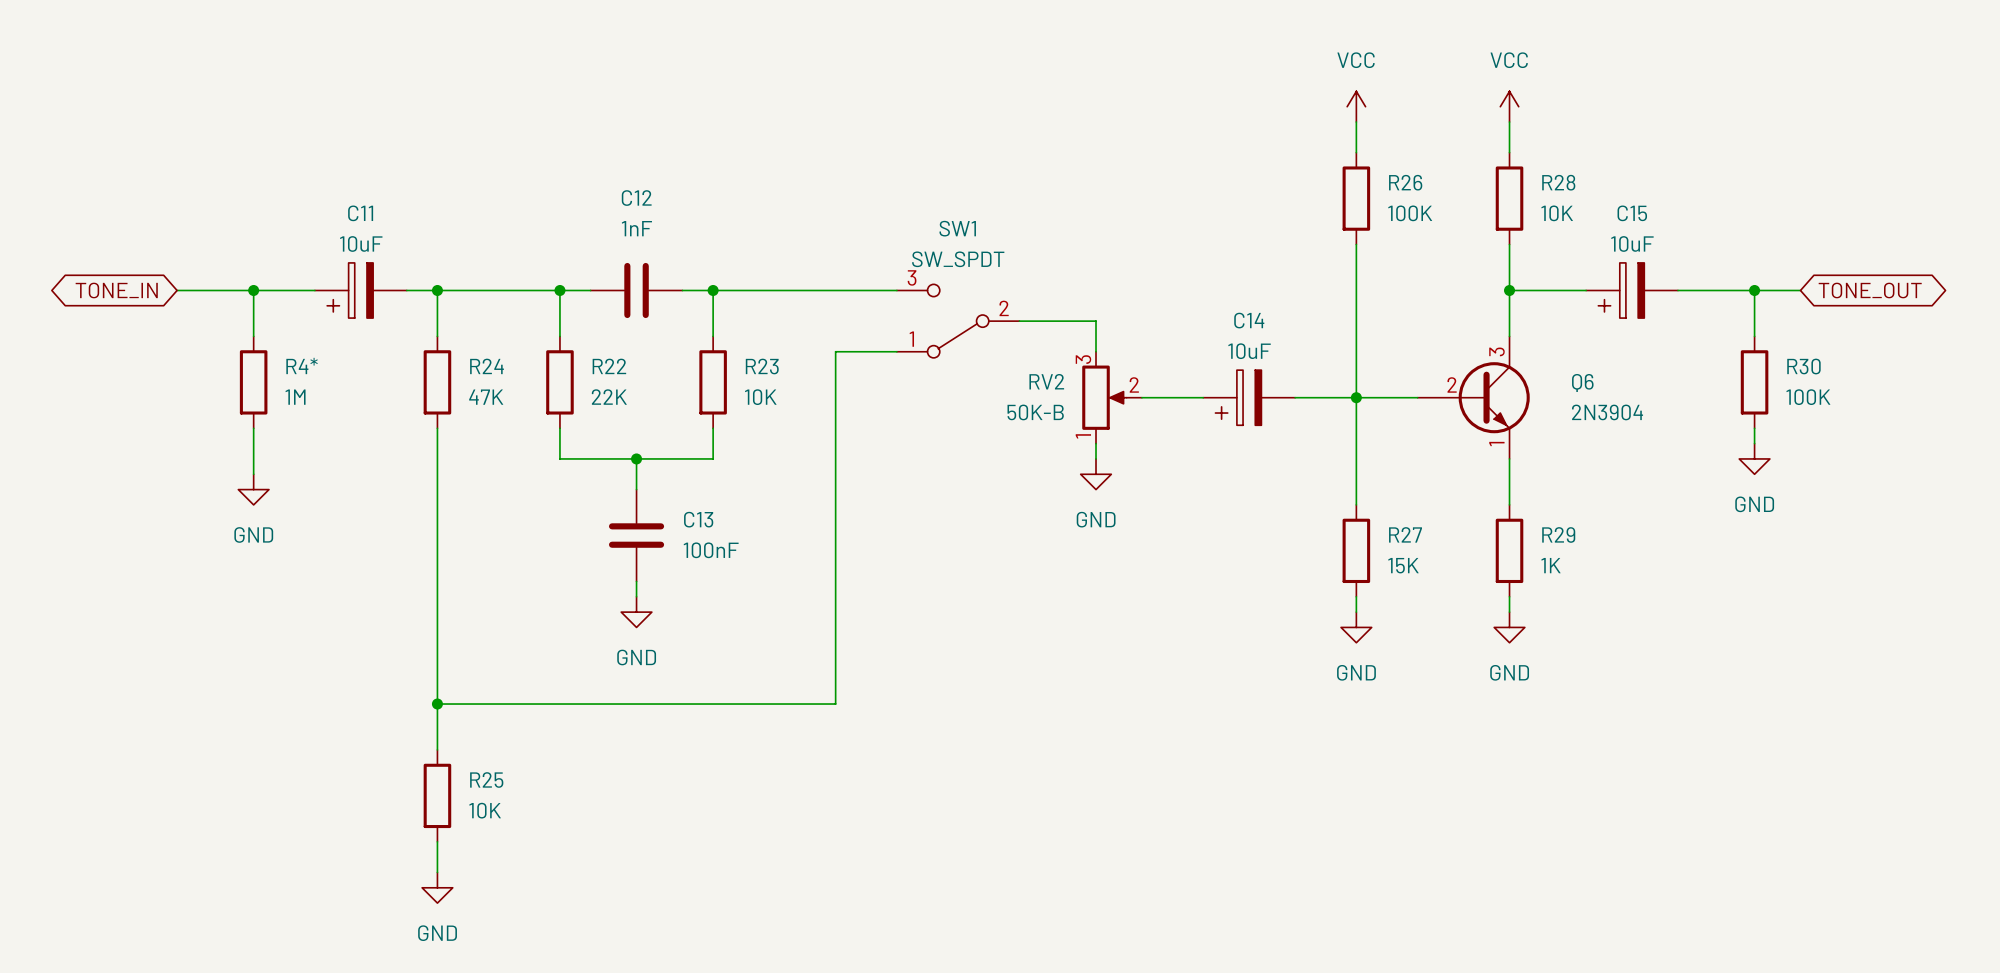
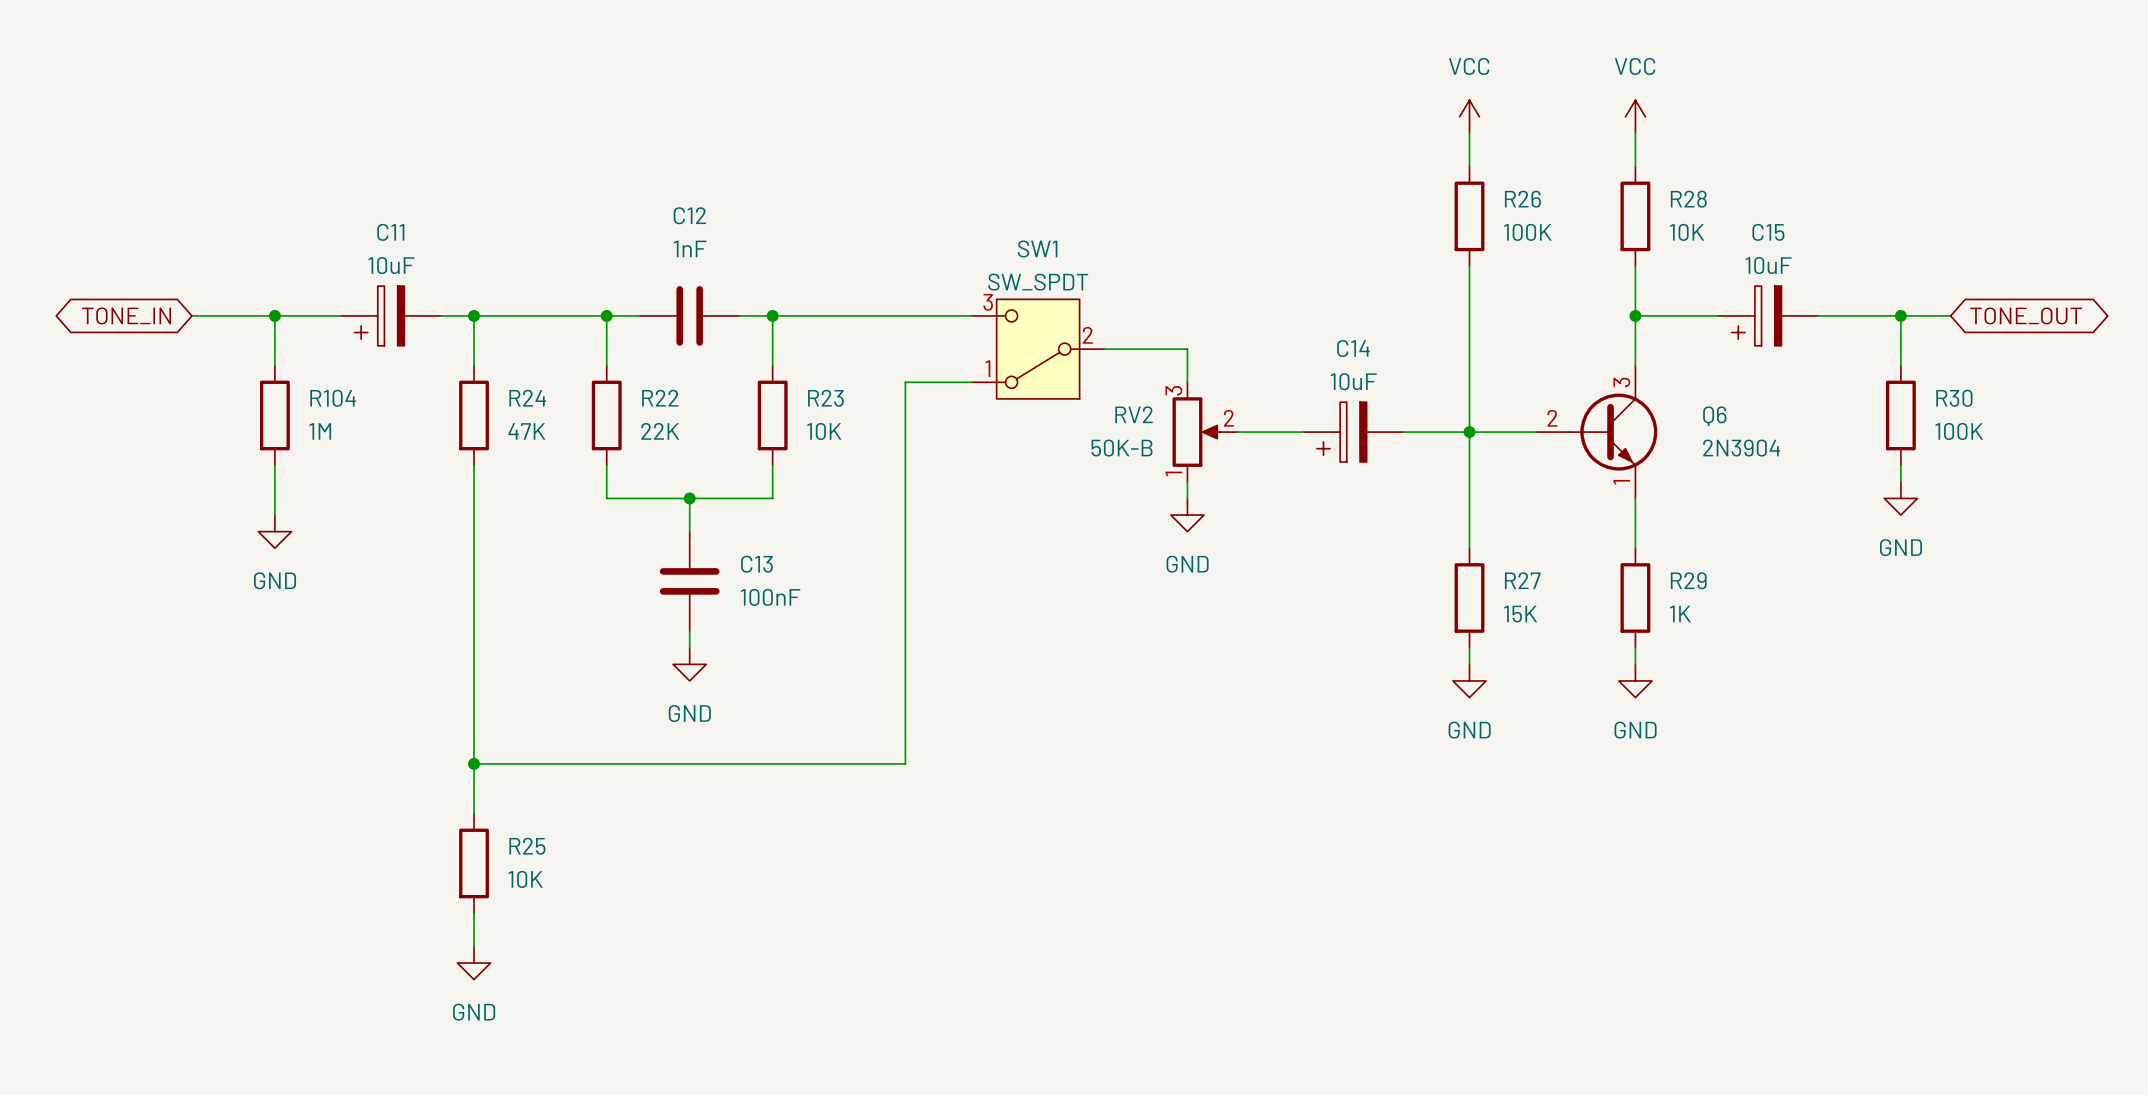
SW1 symbol: [896, 284, 1020, 358] -> [971, 299, 1105, 399]
Q6 symbol: [1417, 336, 1530, 459] -> [1535, 365, 1658, 499]
R4* name: R4* (302, 365) -> R104 (333, 398)

